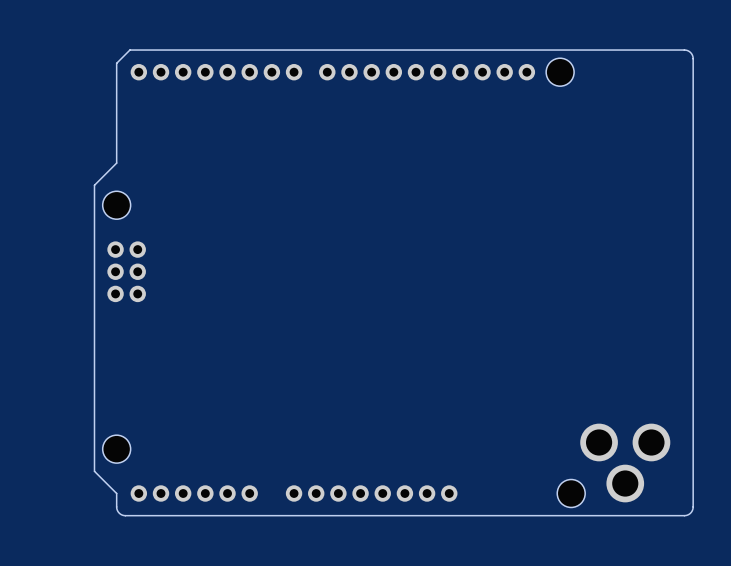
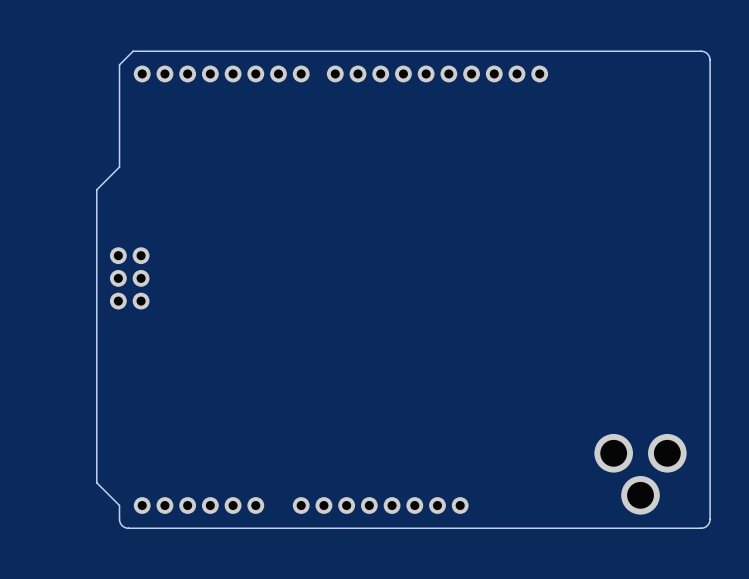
hole: (560, 72) -> none
hole: (116, 205) -> none
hole: (116, 449) -> none
hole: (571, 493) -> none

